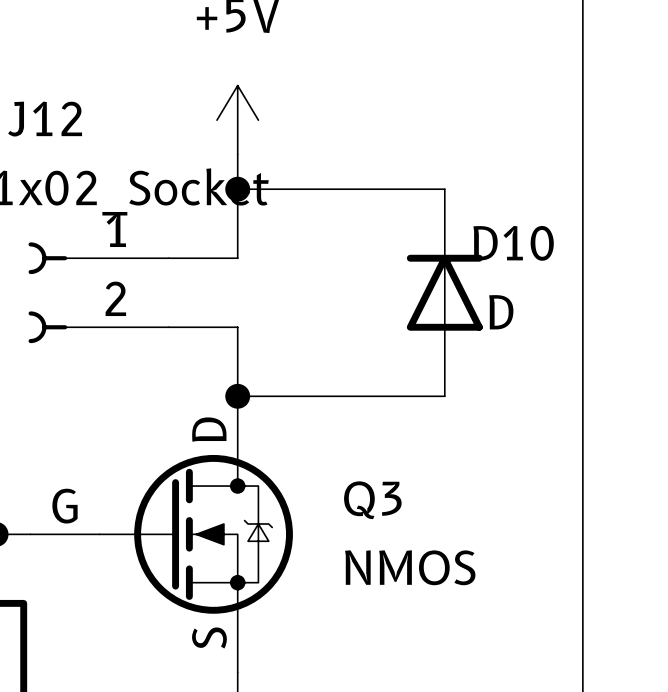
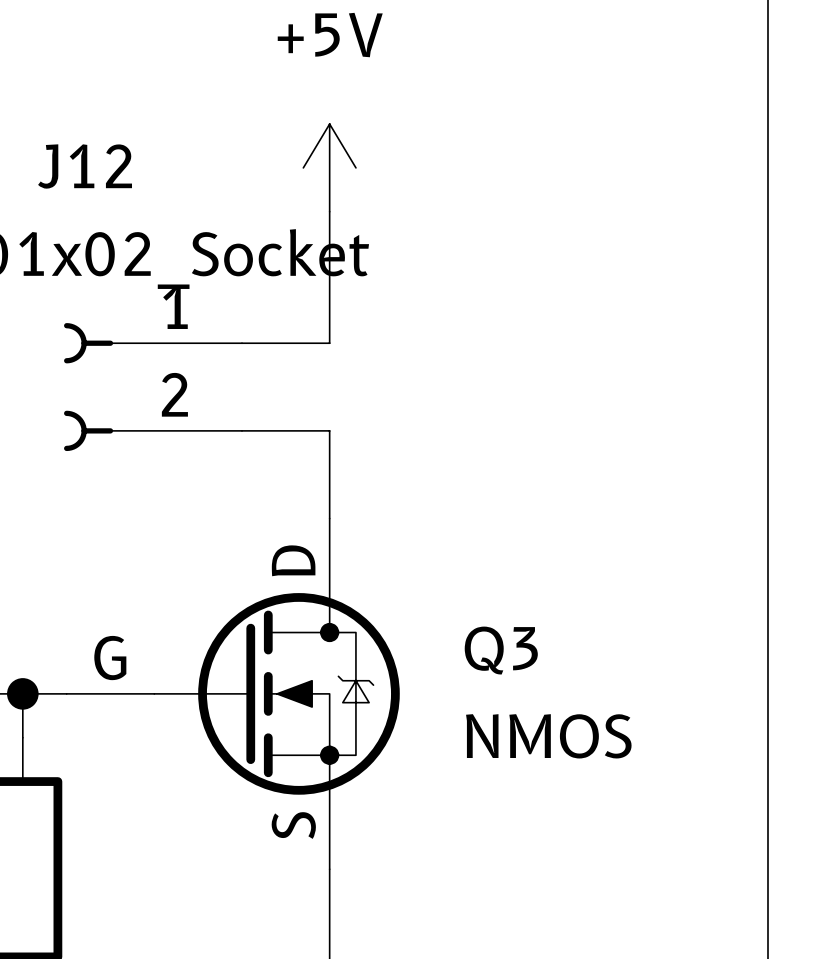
wire: (237, 189) (444, 189) -> none
junction: (237, 189) -> none
D10: D (444, 292) -> none
wire: (237, 396) (444, 396) -> none
junction: (237, 396) -> none

